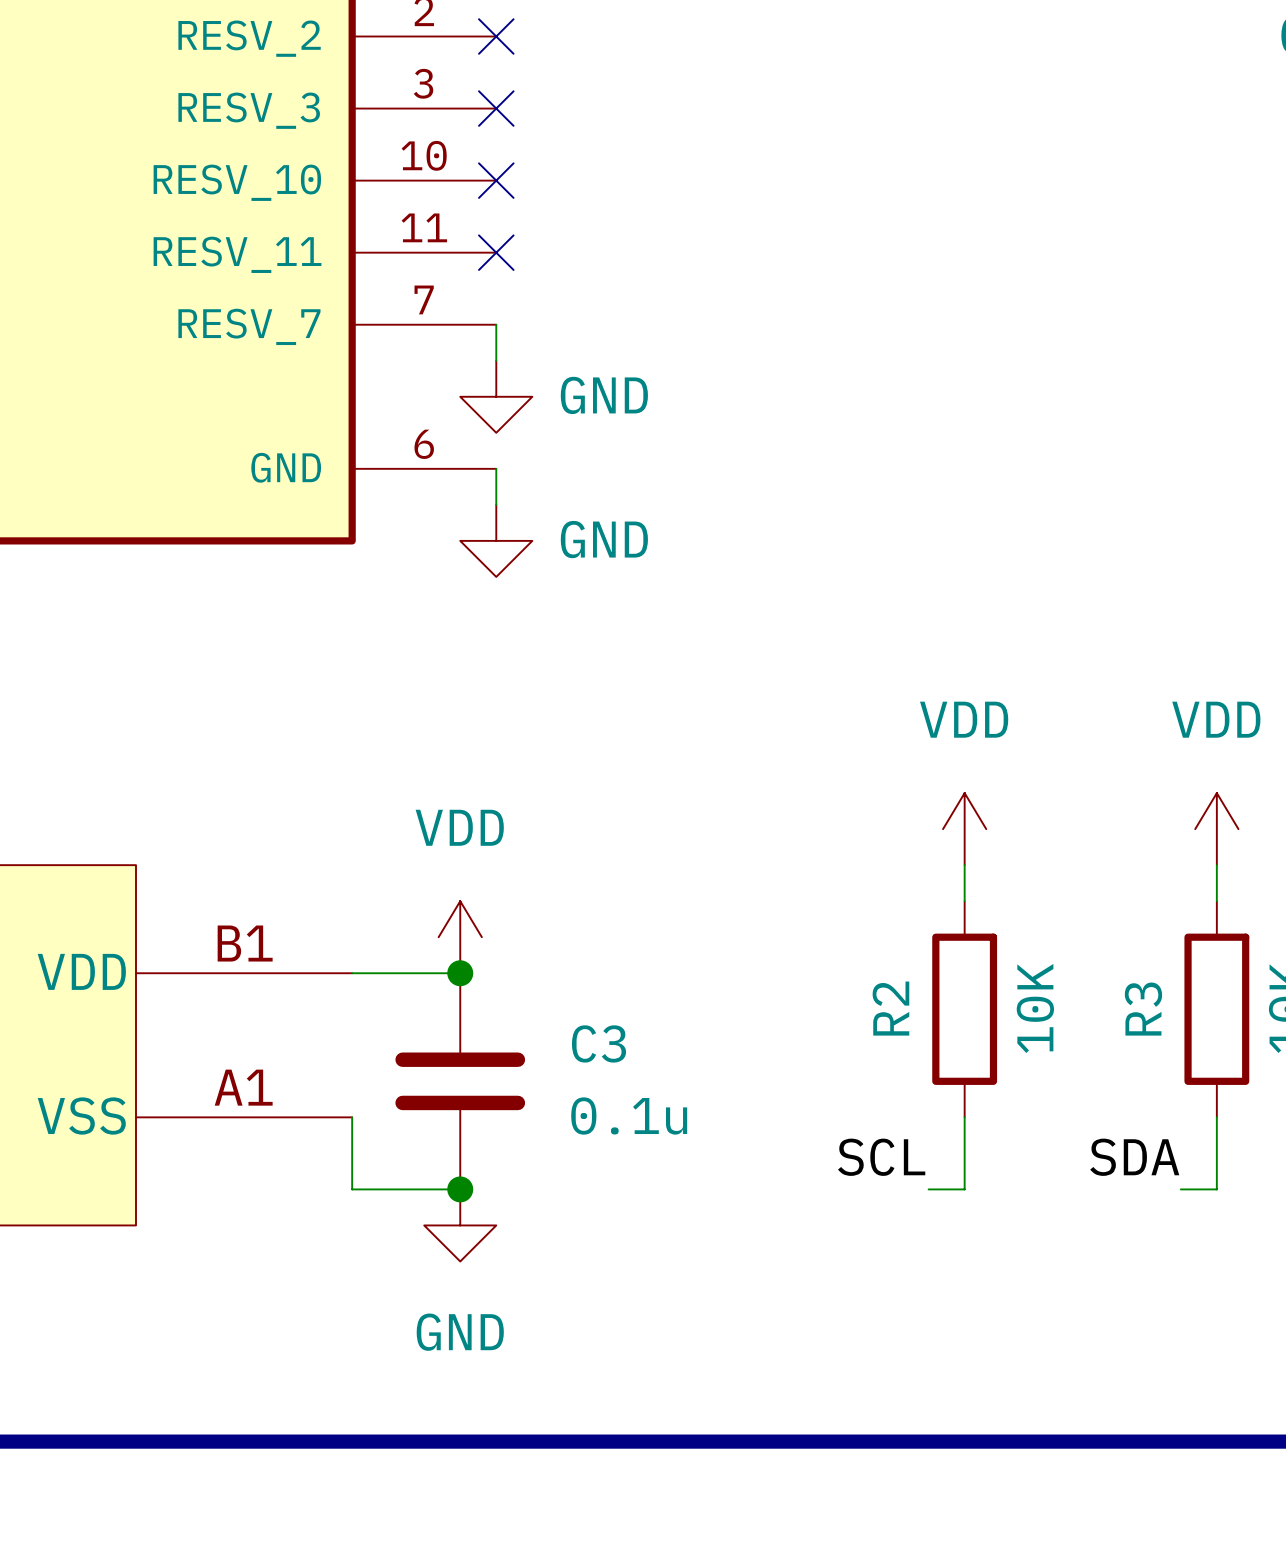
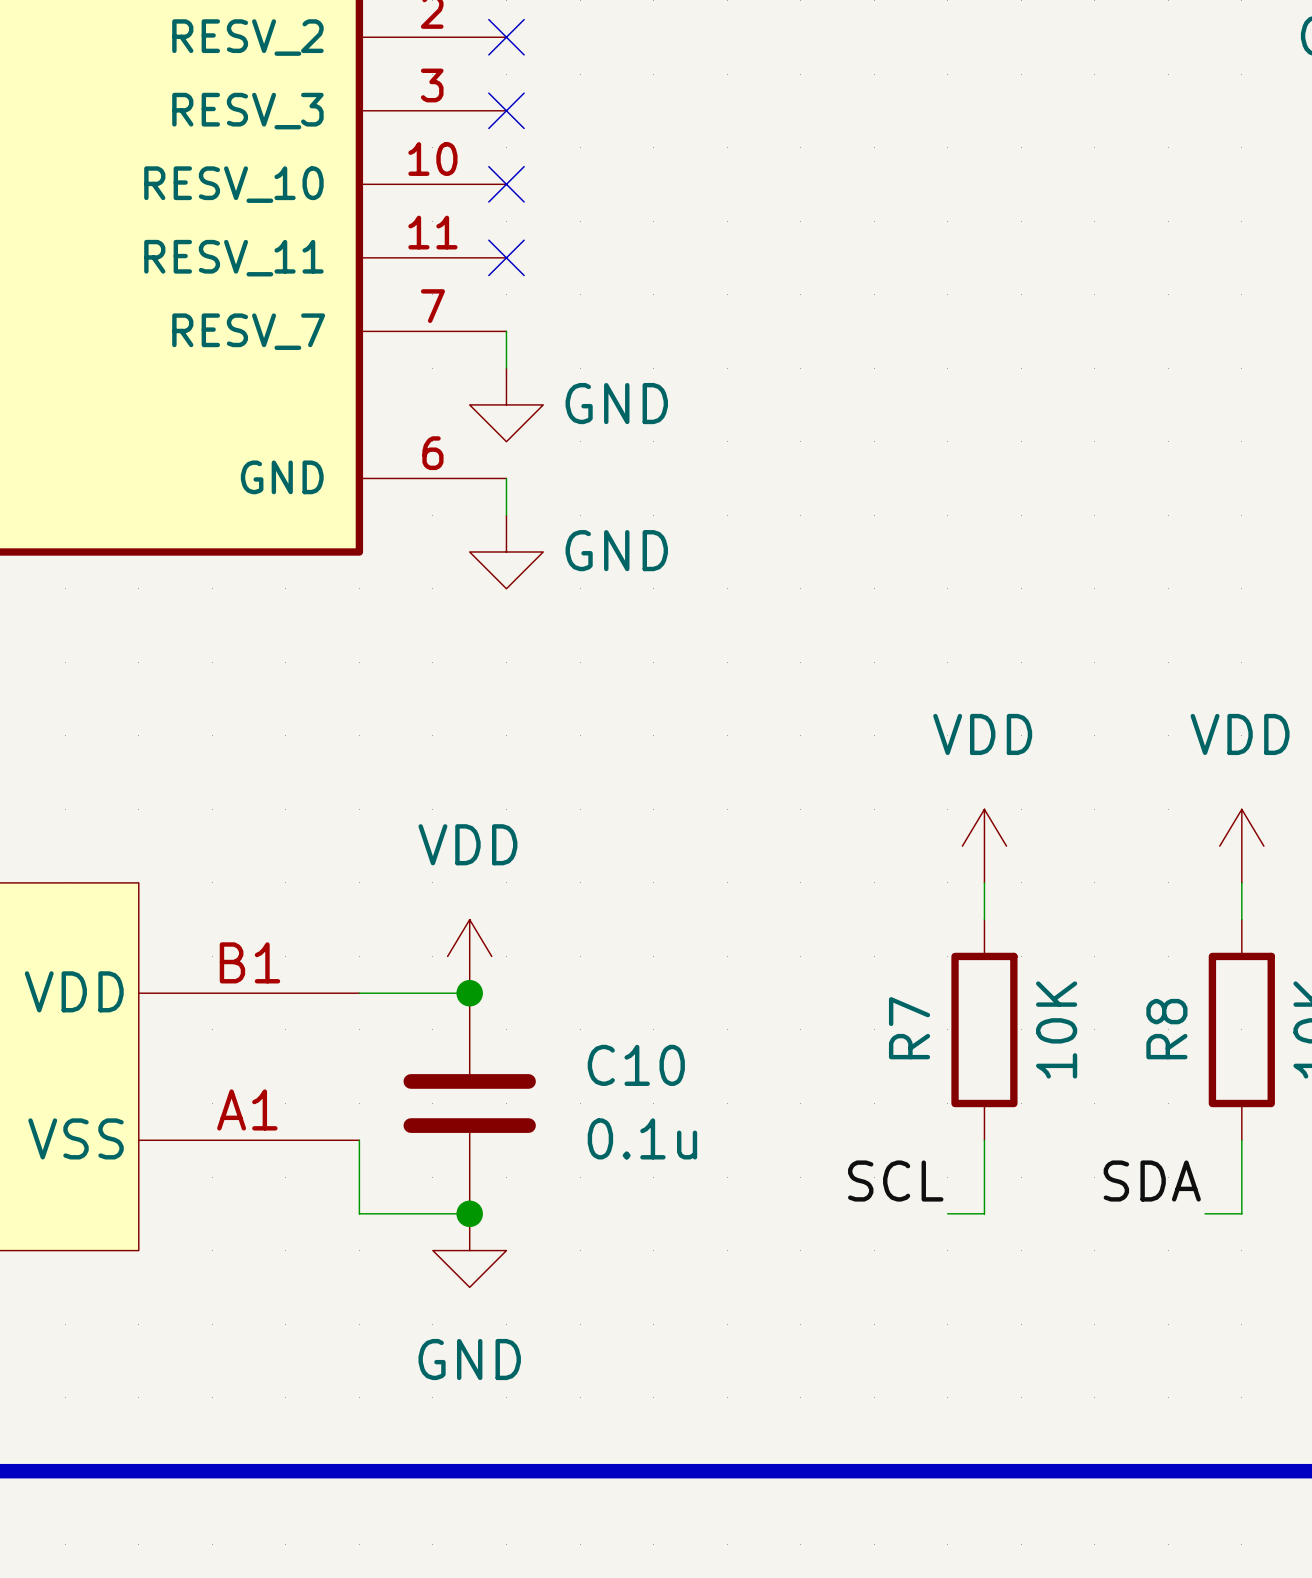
R2 name: R2 (890, 1008) -> R7 (909, 1028)
R3 name: R3 (1143, 1009) -> R8 (1166, 1029)
C3 name: C3 (599, 1043) -> C10 (636, 1065)

